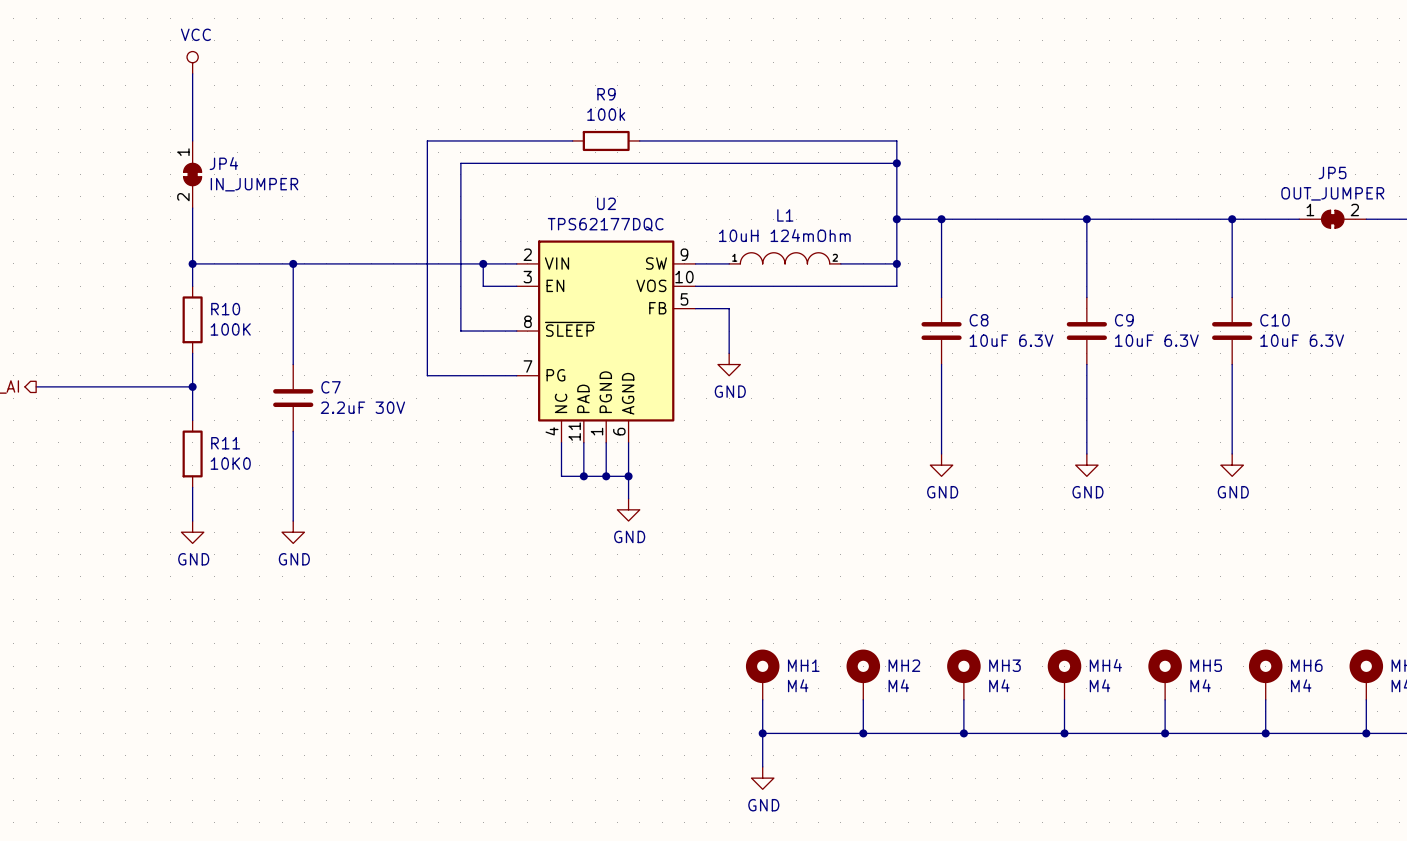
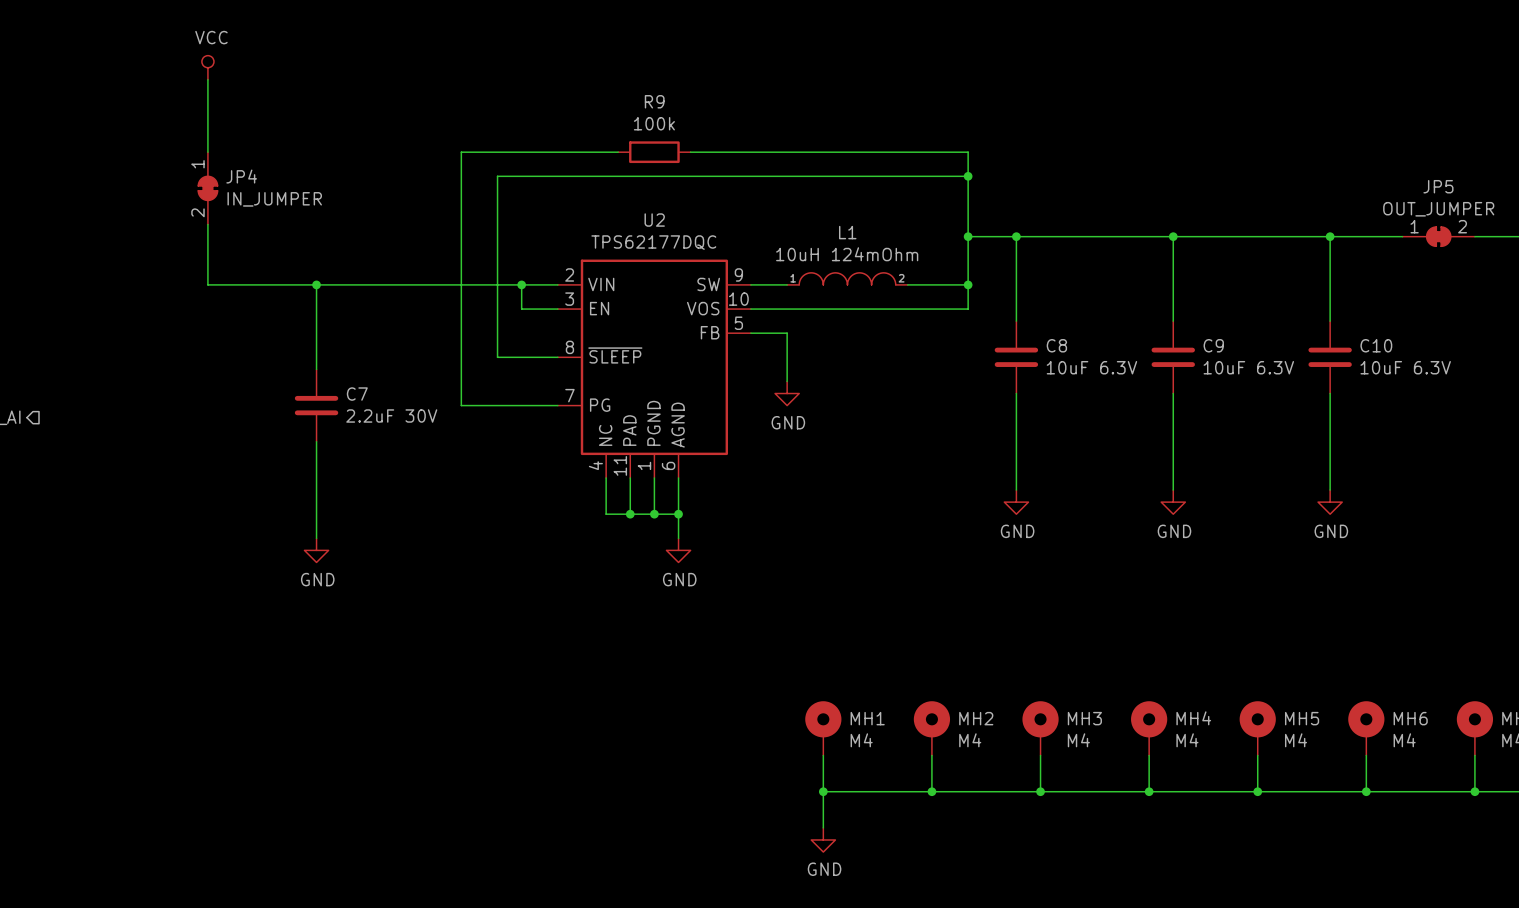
wire: (192, 263) (192, 286) -> none
junction: (192, 263) -> none
R10: 100K (192, 319) -> none
wire: (192, 353) (192, 420) -> none
wire: (36, 386) (192, 386) -> none
junction: (192, 386) -> none
C7 position: (293, 398) -> (316, 405)
R11: 10K0 (192, 453) -> none
wire: (192, 487) (192, 521) -> none
power symbol: GND (192, 532) -> none
power symbol position: GND (293, 532) -> GND (316, 550)

